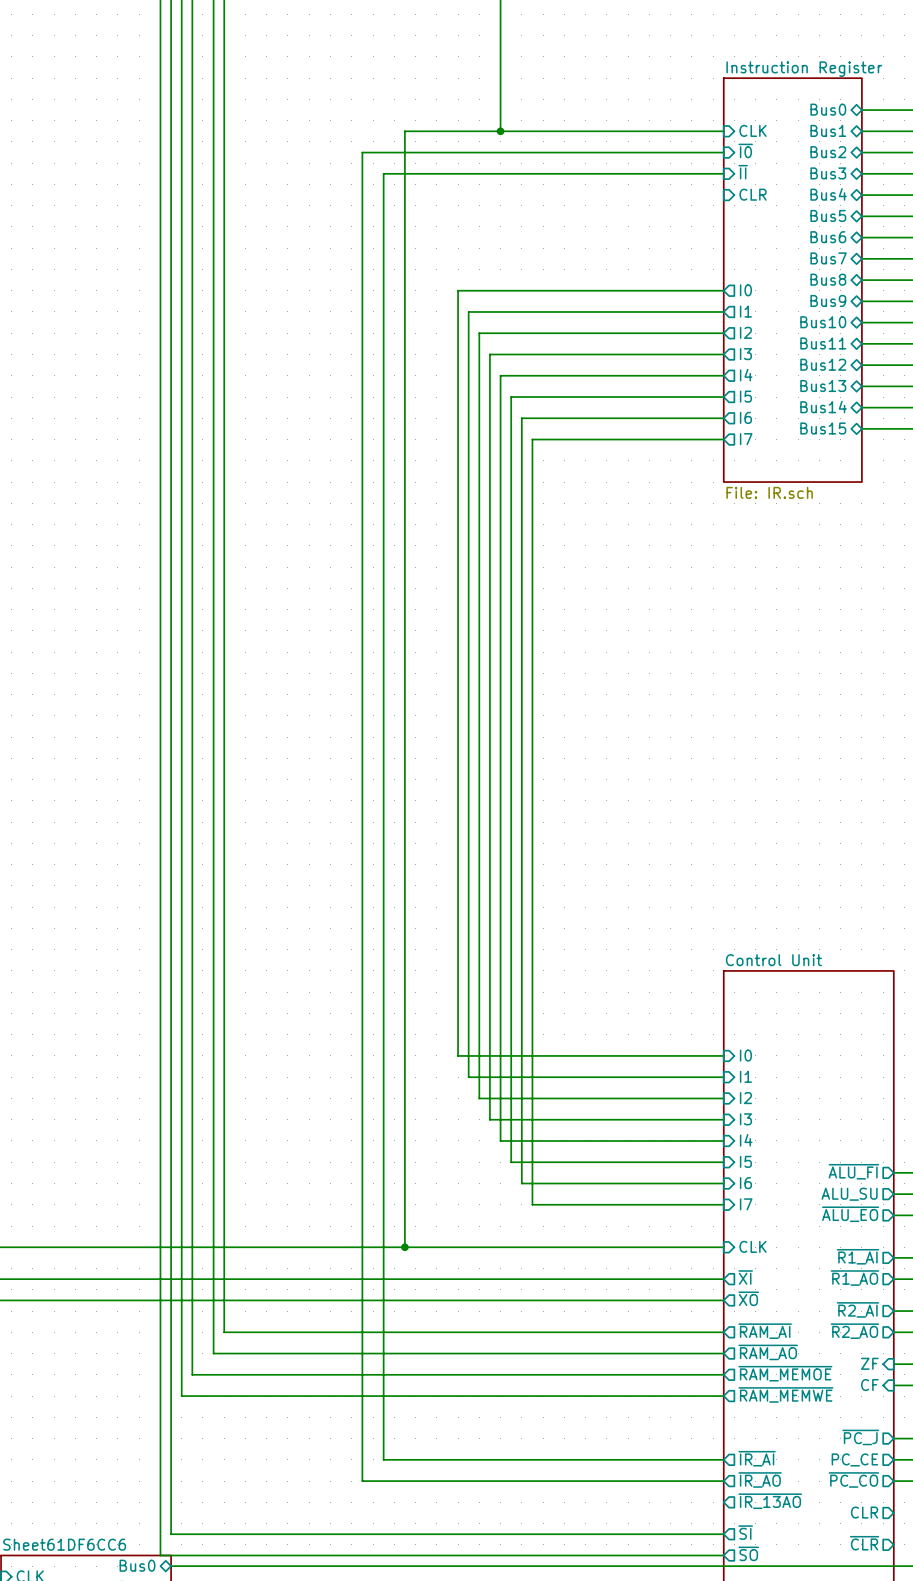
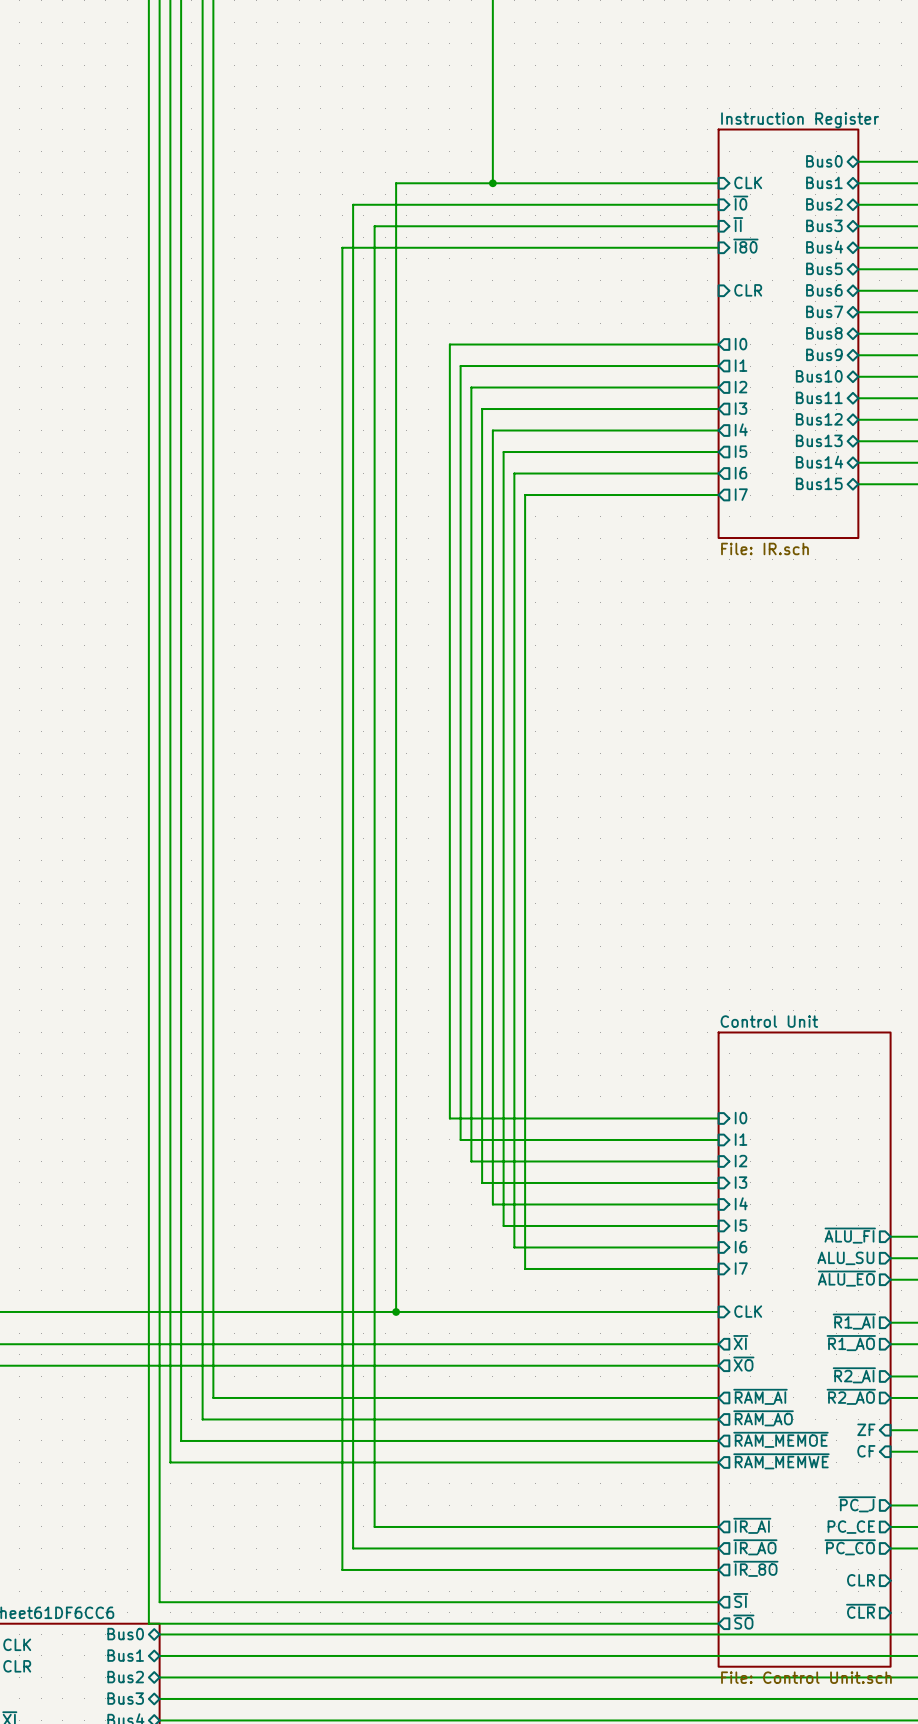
sheet pin: CLR (753, 194) -> ~{I80} (745, 246)
wire: none -> (718, 247) (342, 247) (342, 1569) (718, 1569)
sheet pin: none -> CLR (748, 290)
sheet pin: ~{IR_13AO} (770, 1501) -> ~{IR_8O} (755, 1568)

